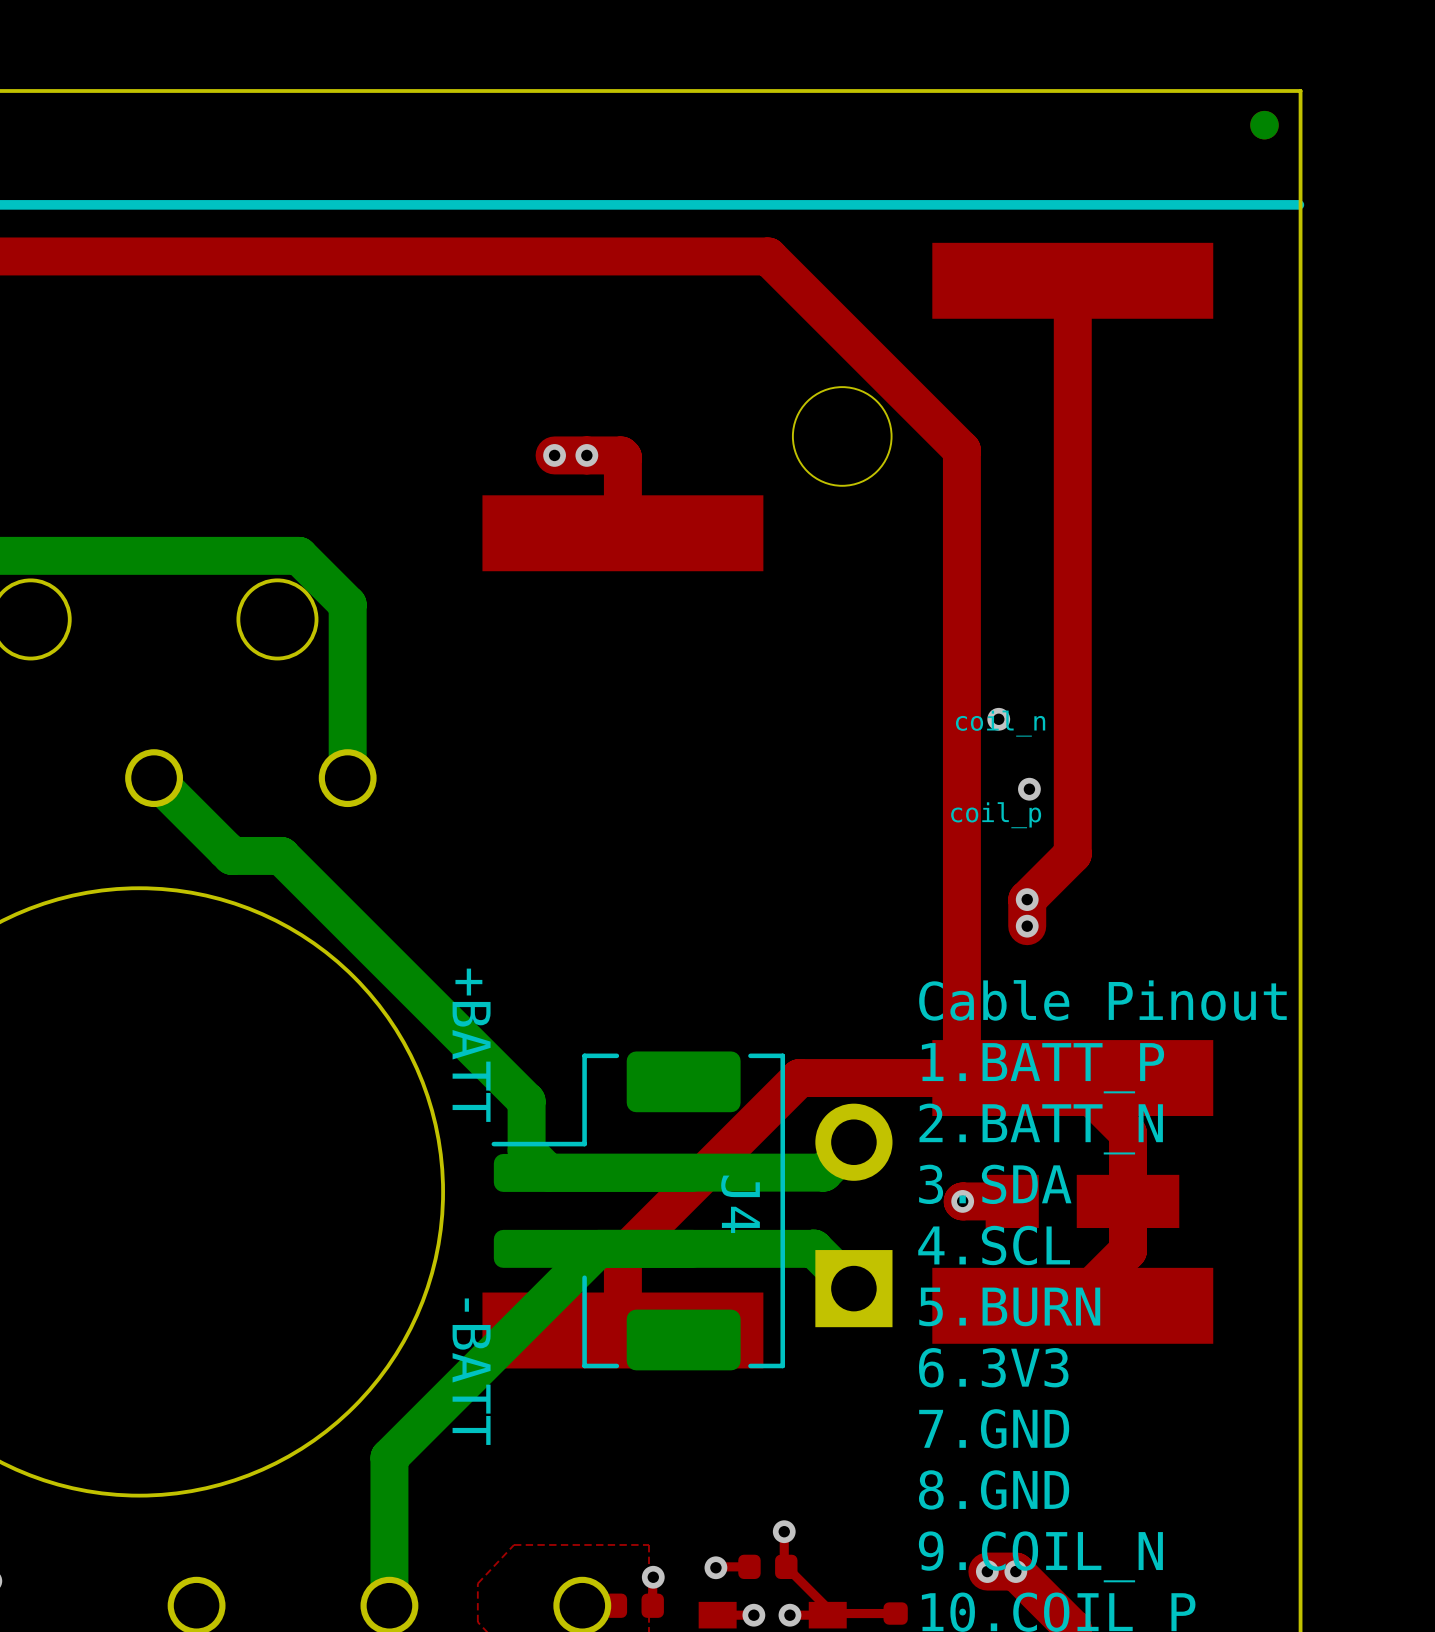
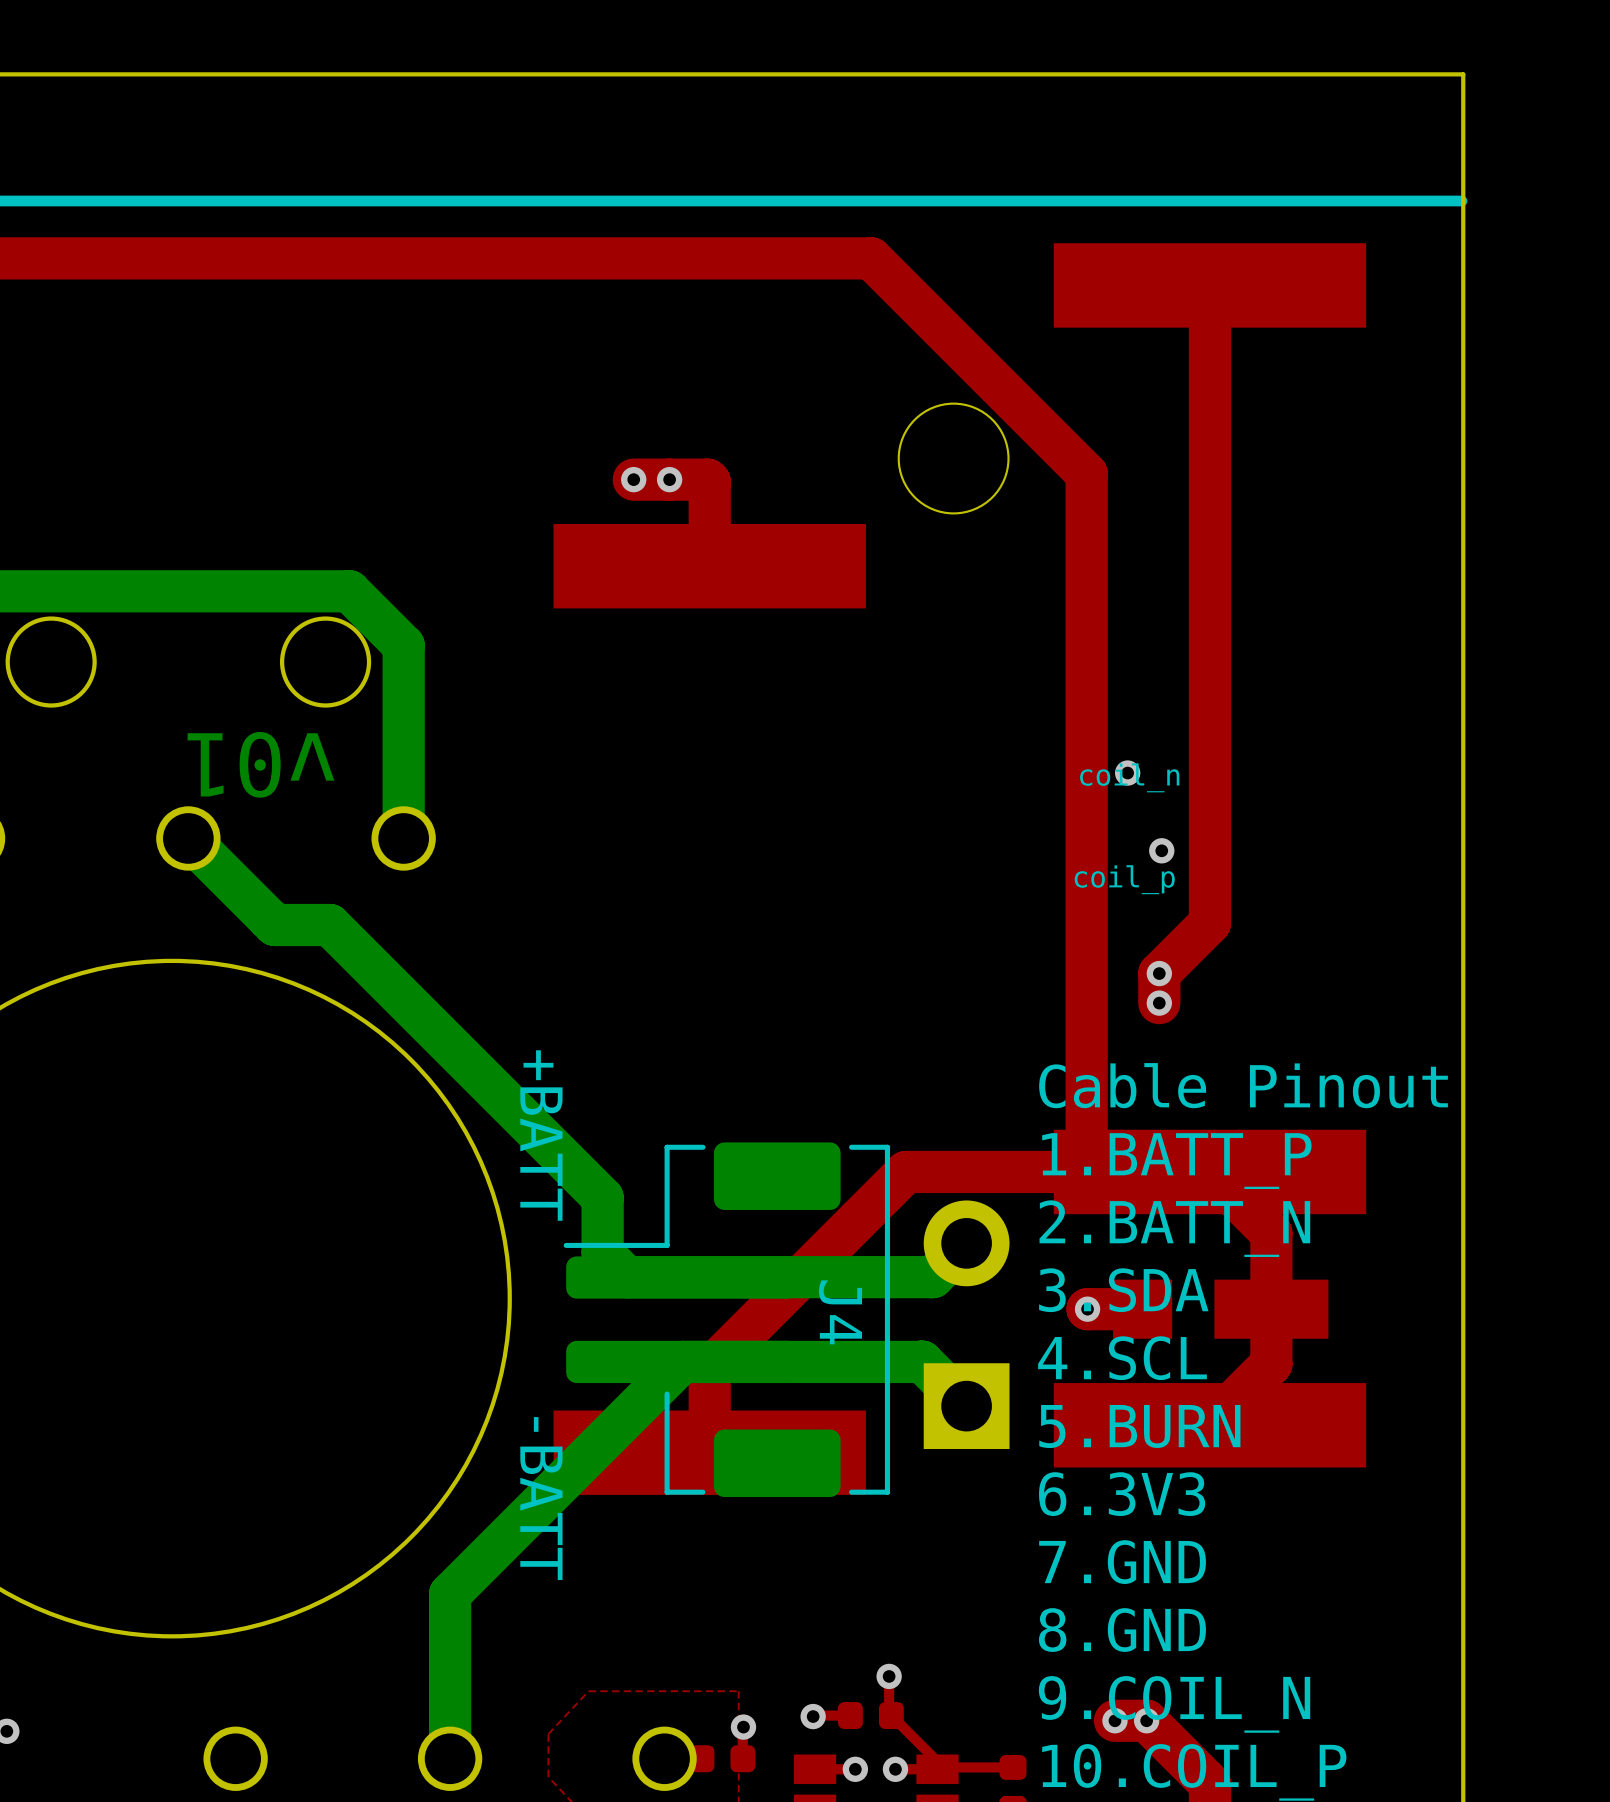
part: (1264, 125) -> none
text: none -> v01 (260, 764)

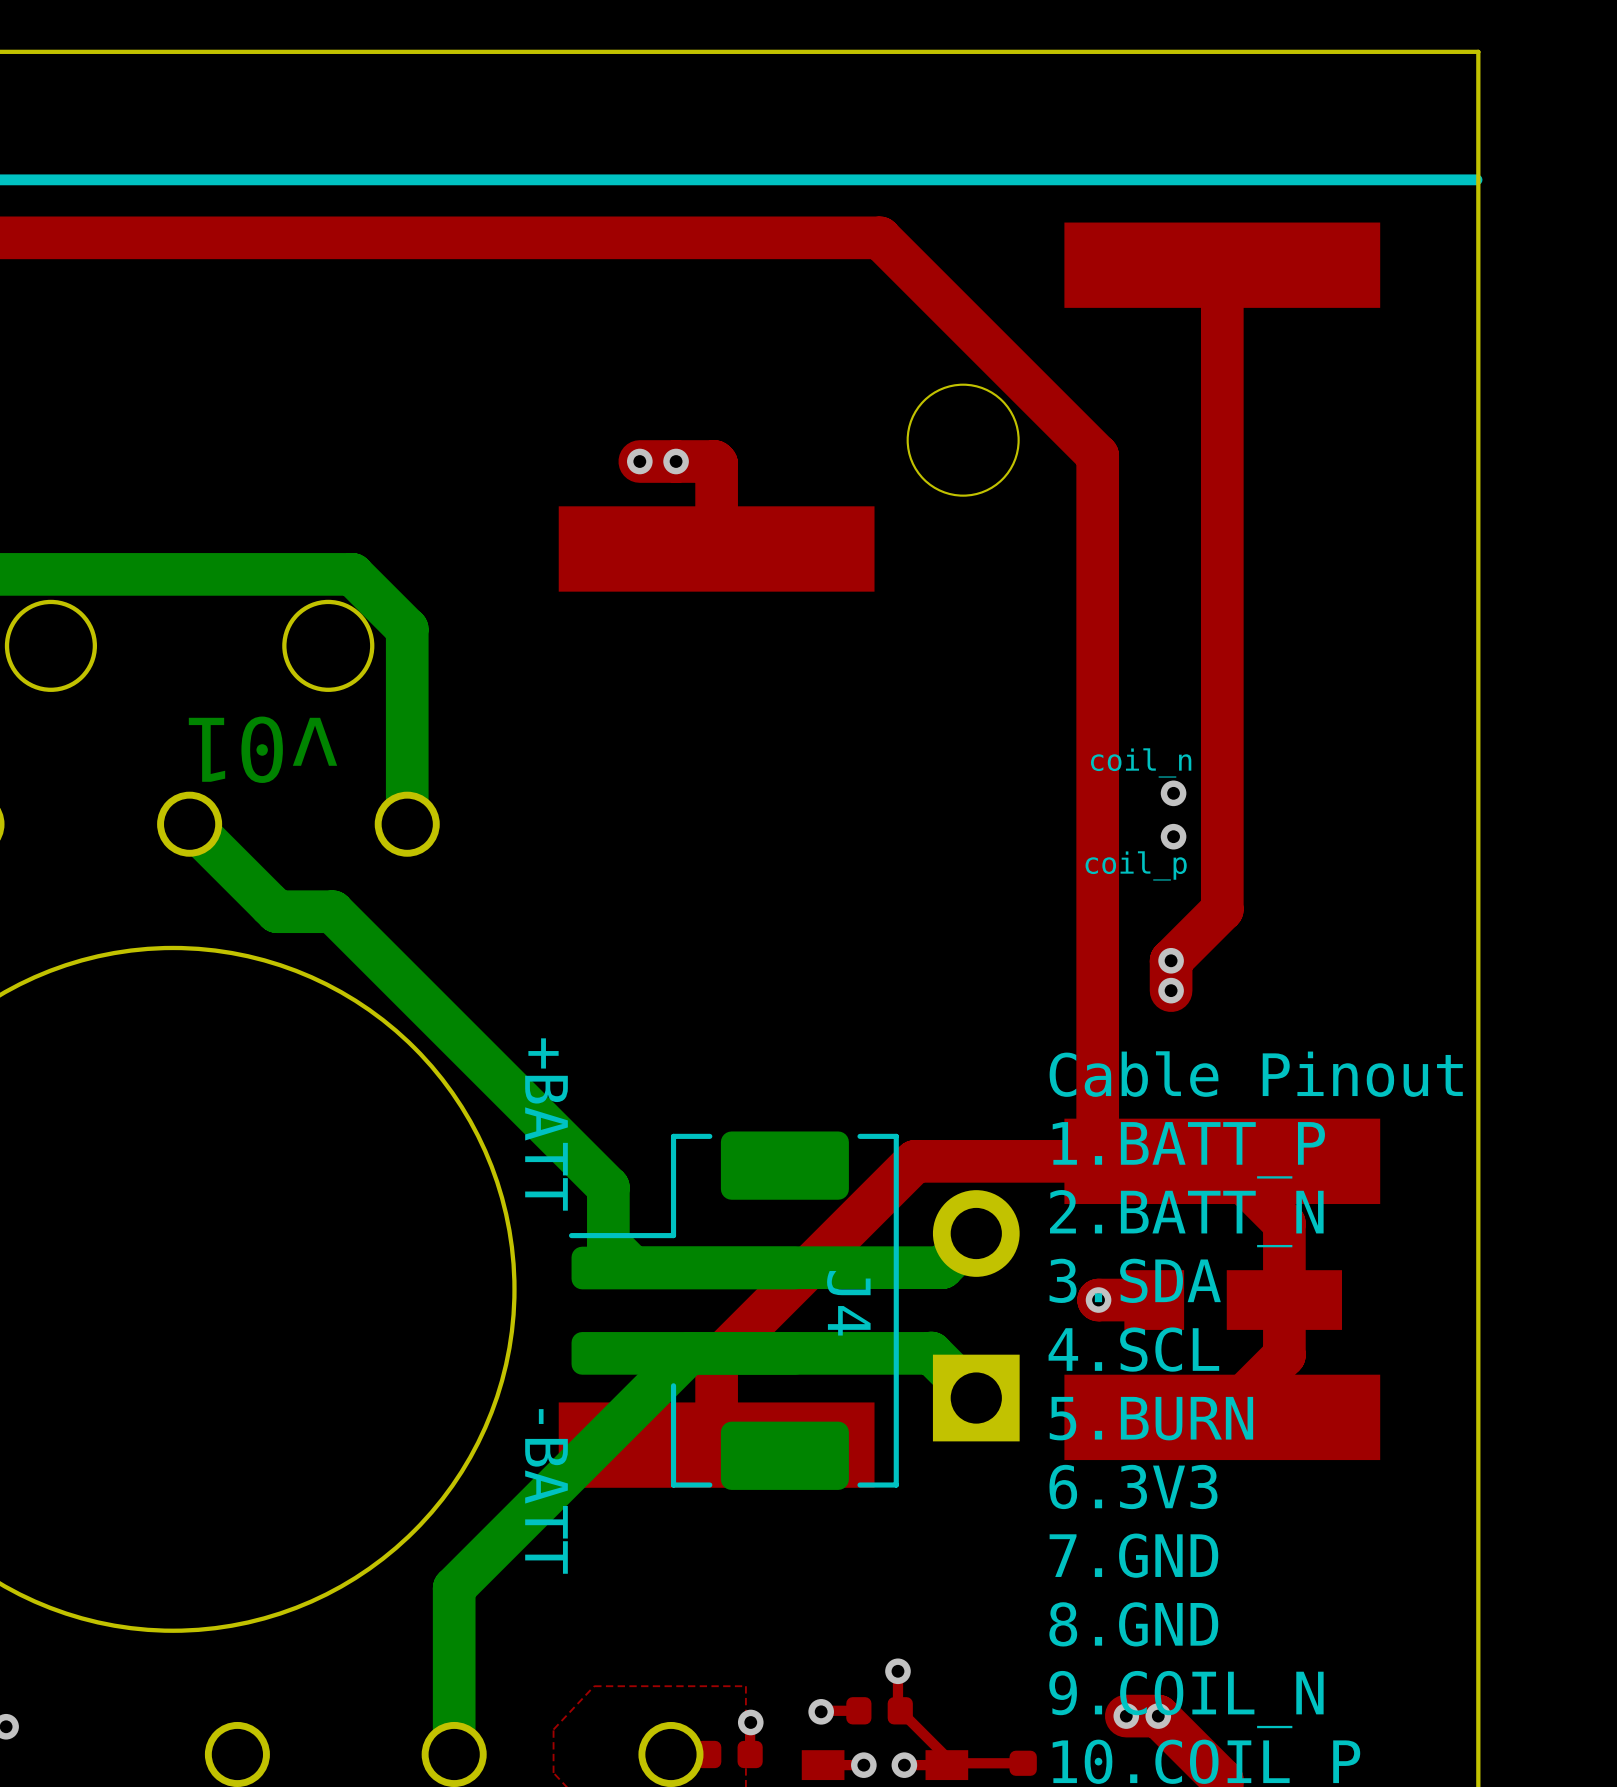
via position: (1127, 773) -> (1173, 793)

